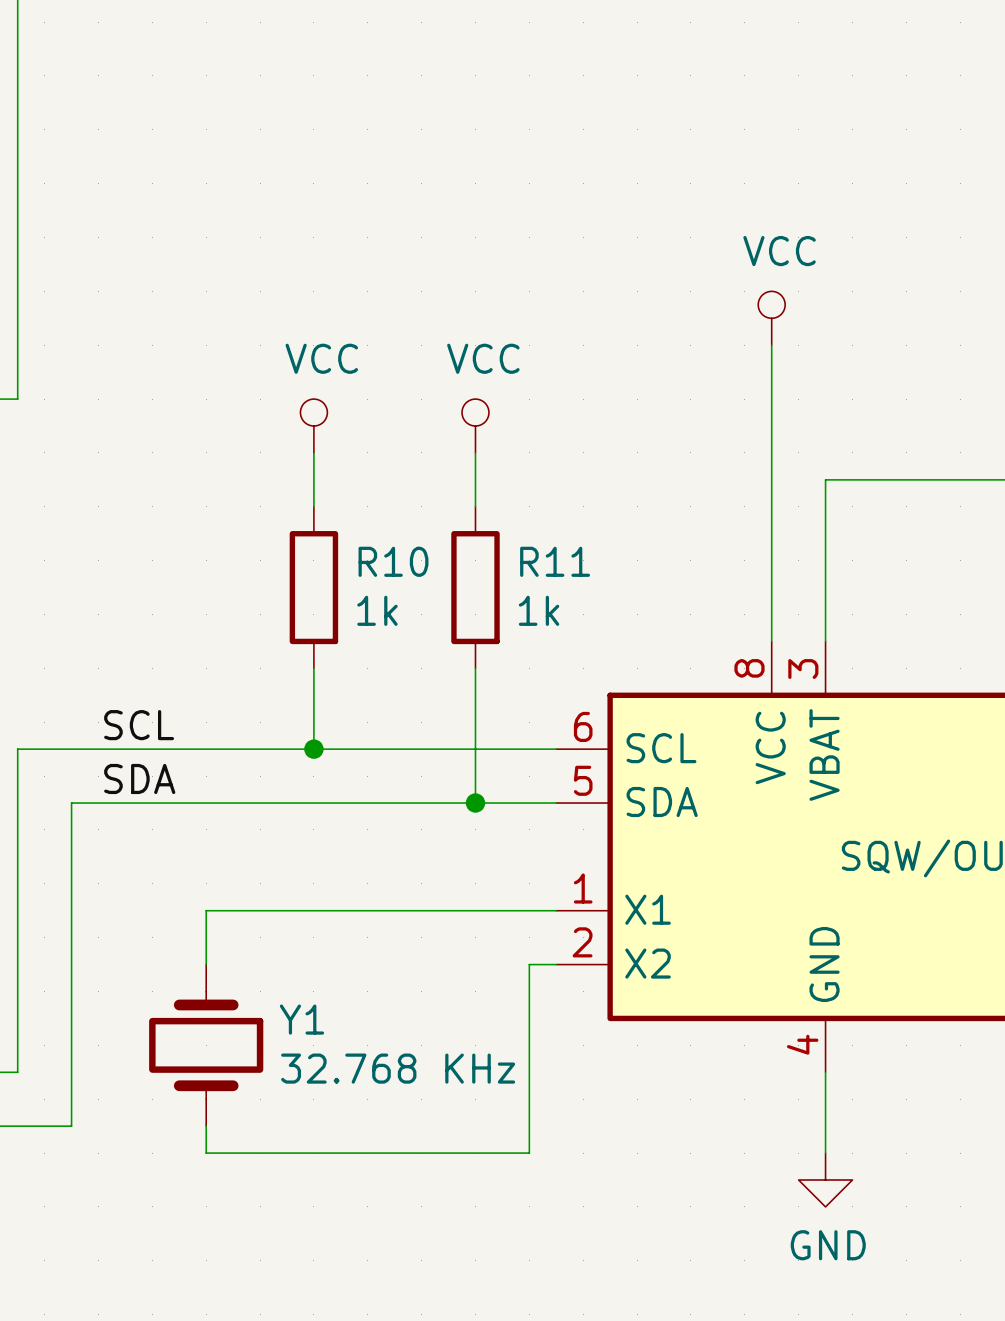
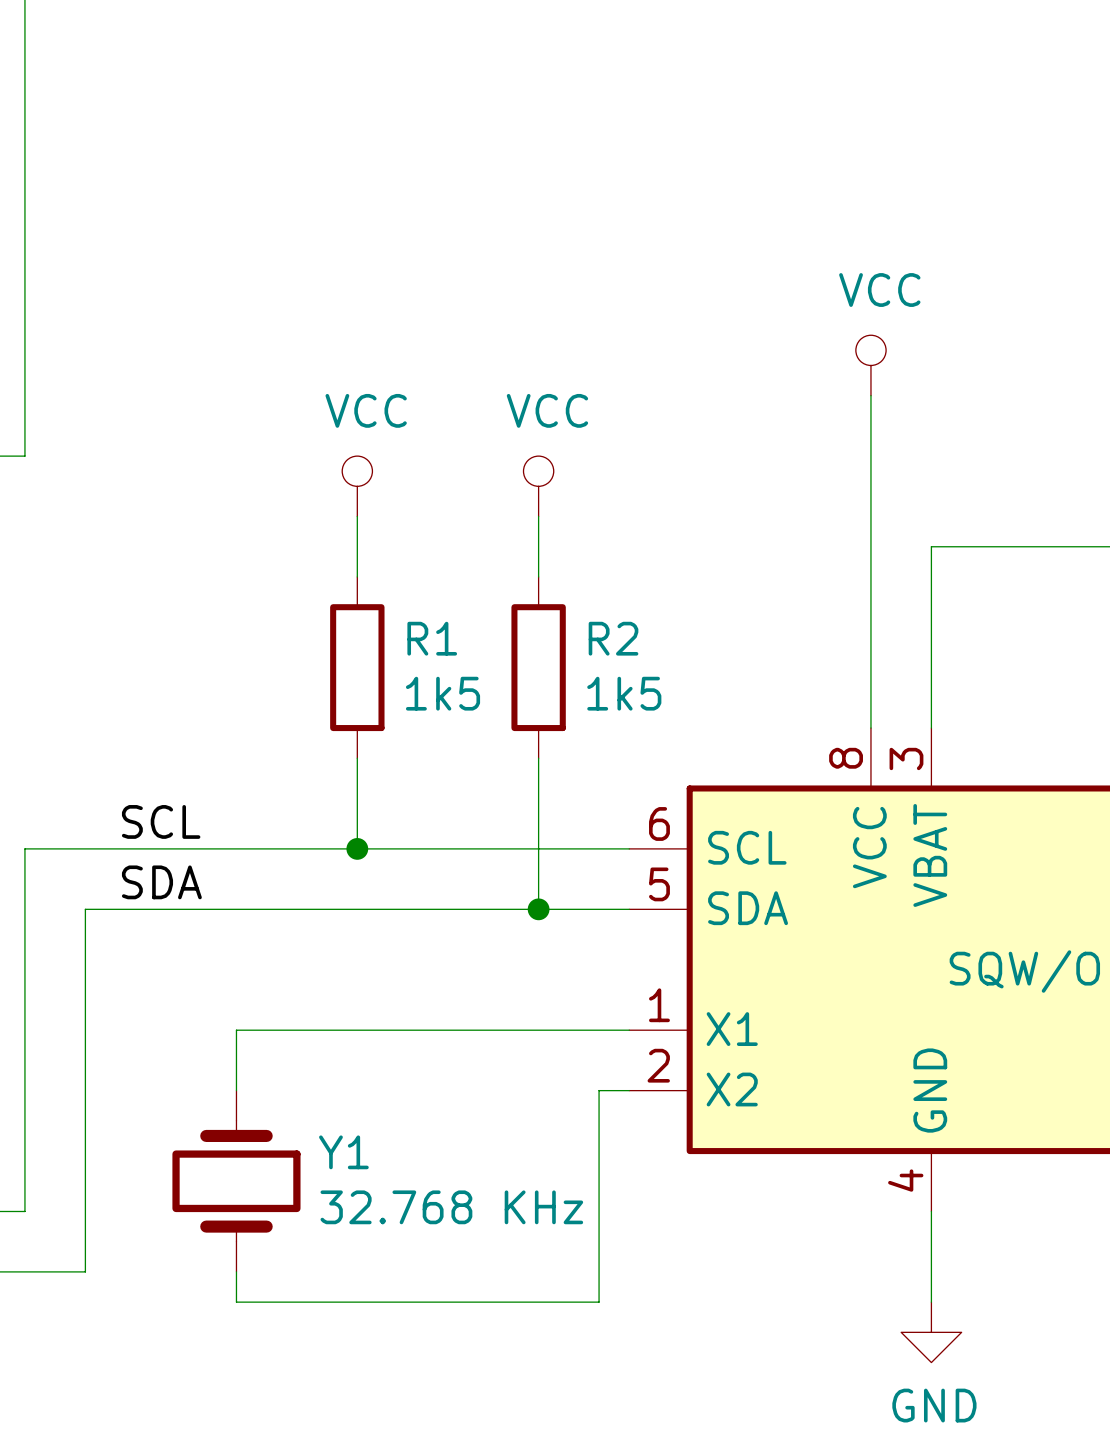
R10 name: R10 (393, 561) -> R1 (432, 638)
R11 name: R11 (555, 561) -> R2 (613, 638)
R10 value: 1k (377, 610) -> 1k5 (443, 693)
R11 value: 1k (539, 610) -> 1k5 (624, 693)

